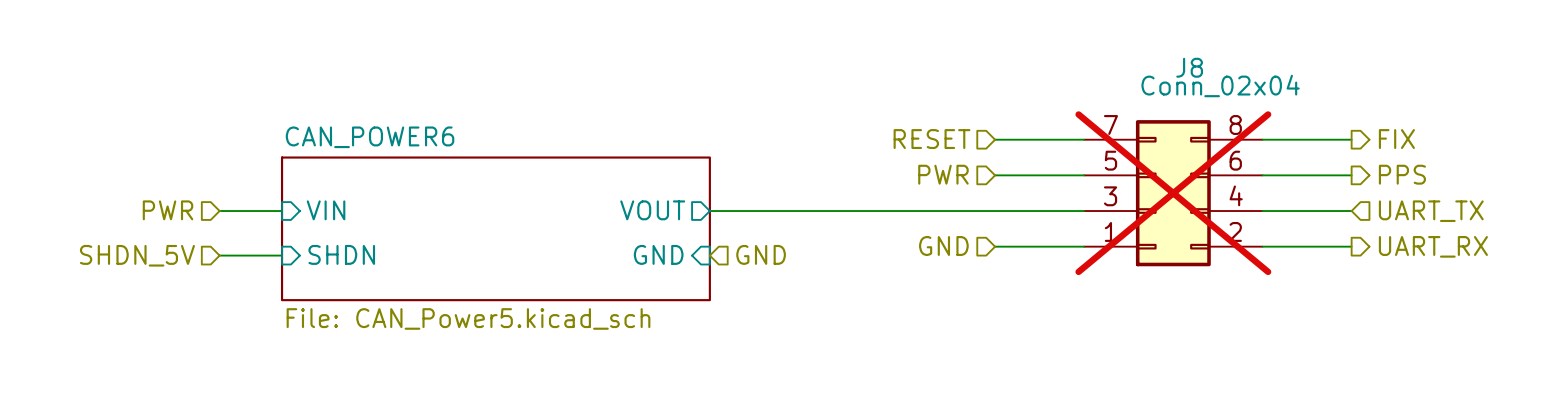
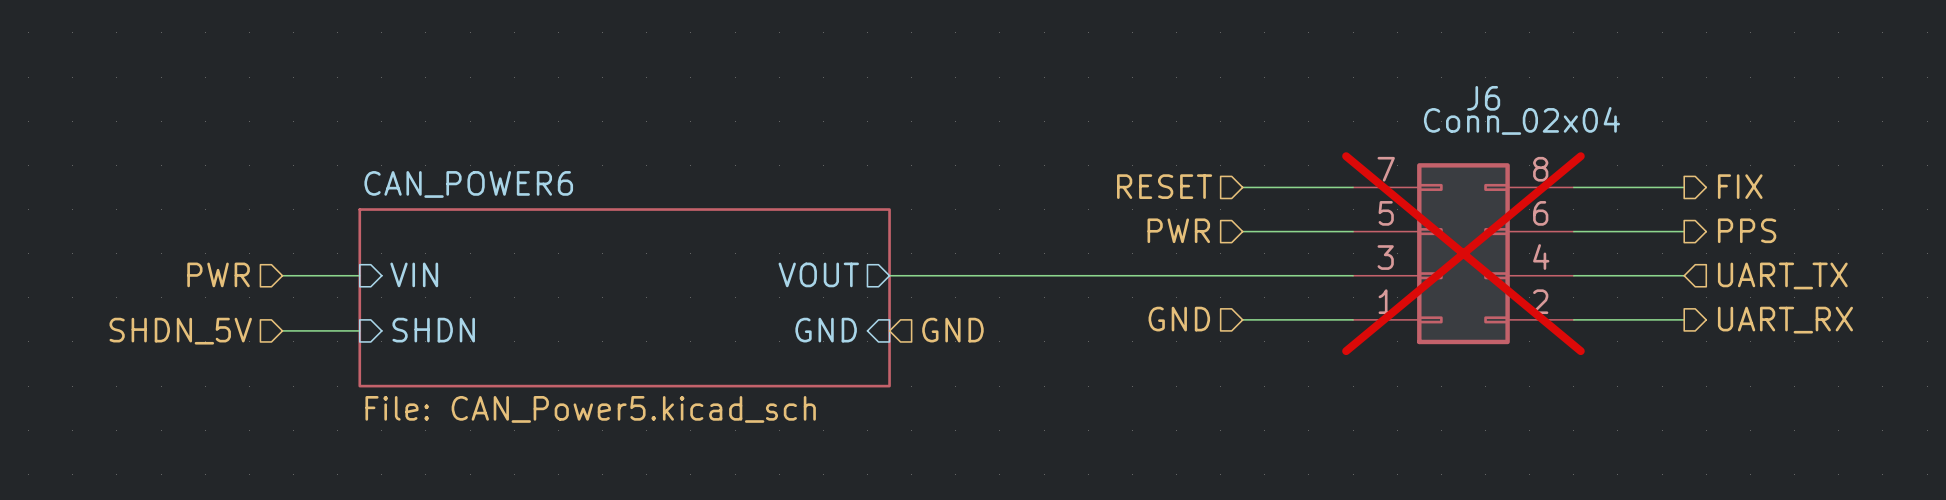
J8 name: J8 (1189, 67) -> J6 (1483, 98)

